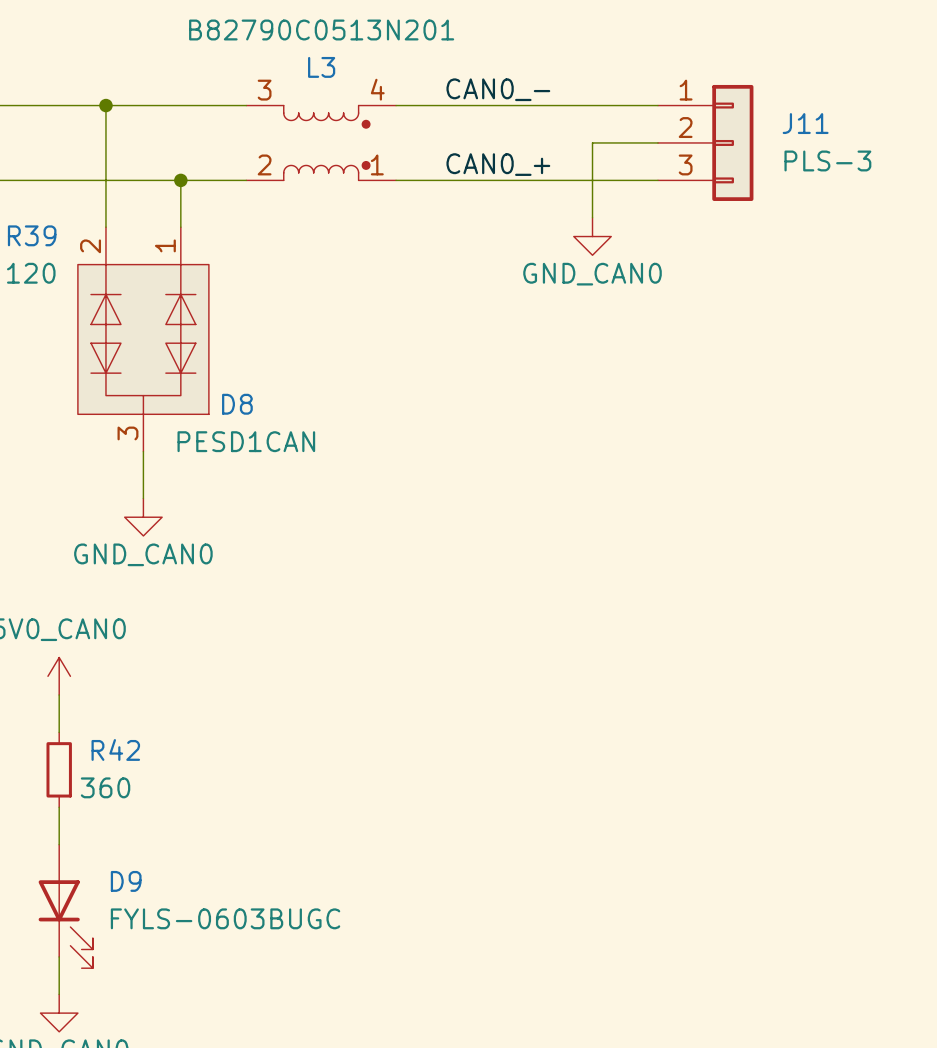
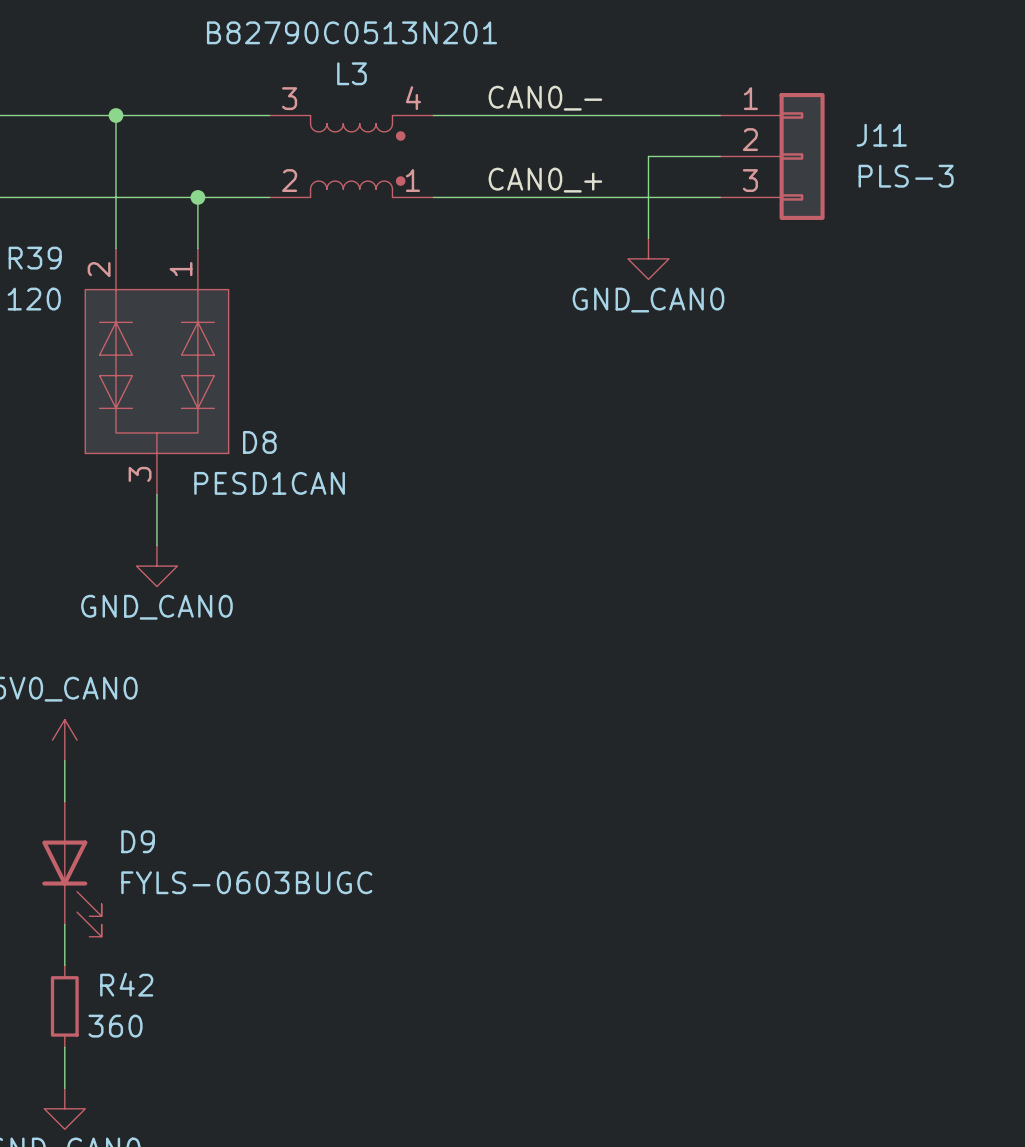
R42 position: (59, 769) -> (64, 1006)
D9 position: (65, 906) -> (71, 869)

